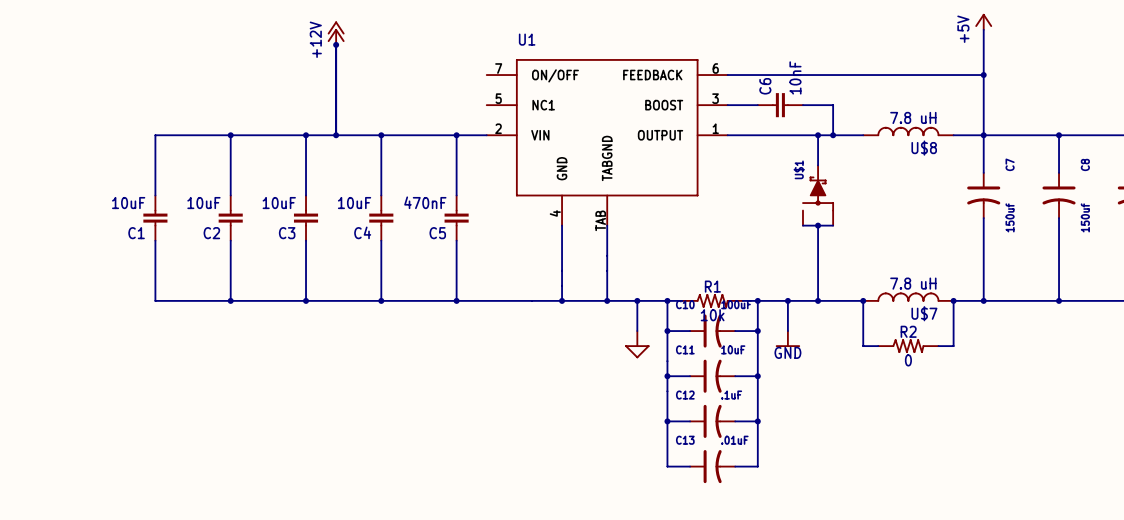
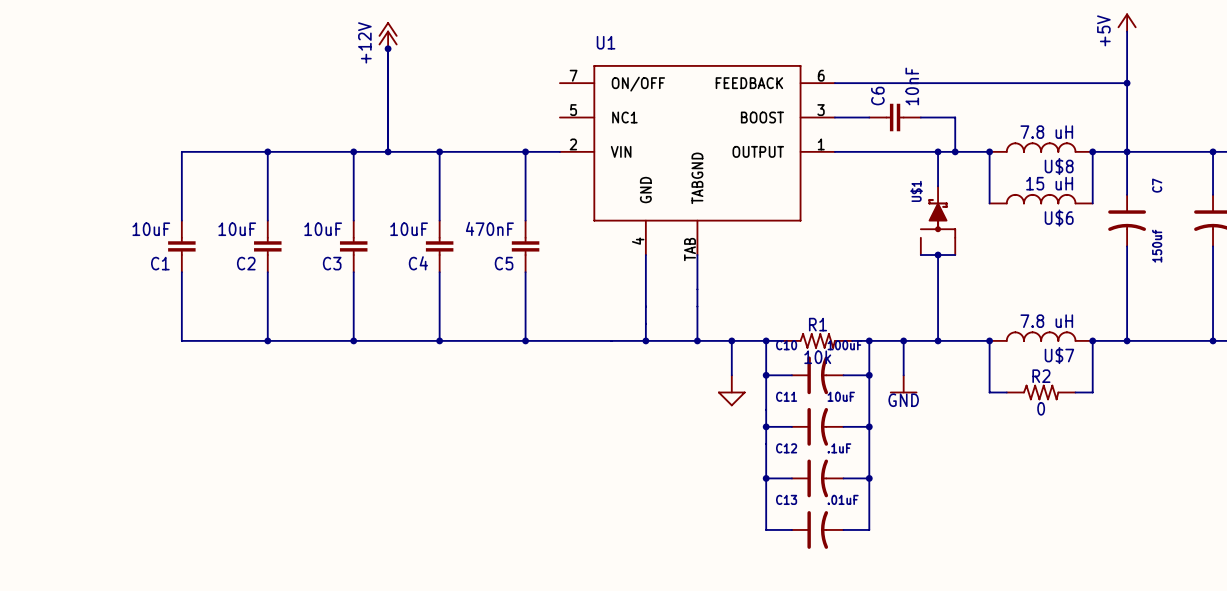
wire: none -> (989, 151) (989, 203)
junction: none -> (989, 151)
wire: none -> (1092, 151) (1092, 203)
junction: none -> (1092, 151)
U$6: none -> 15 uH (1041, 199)

